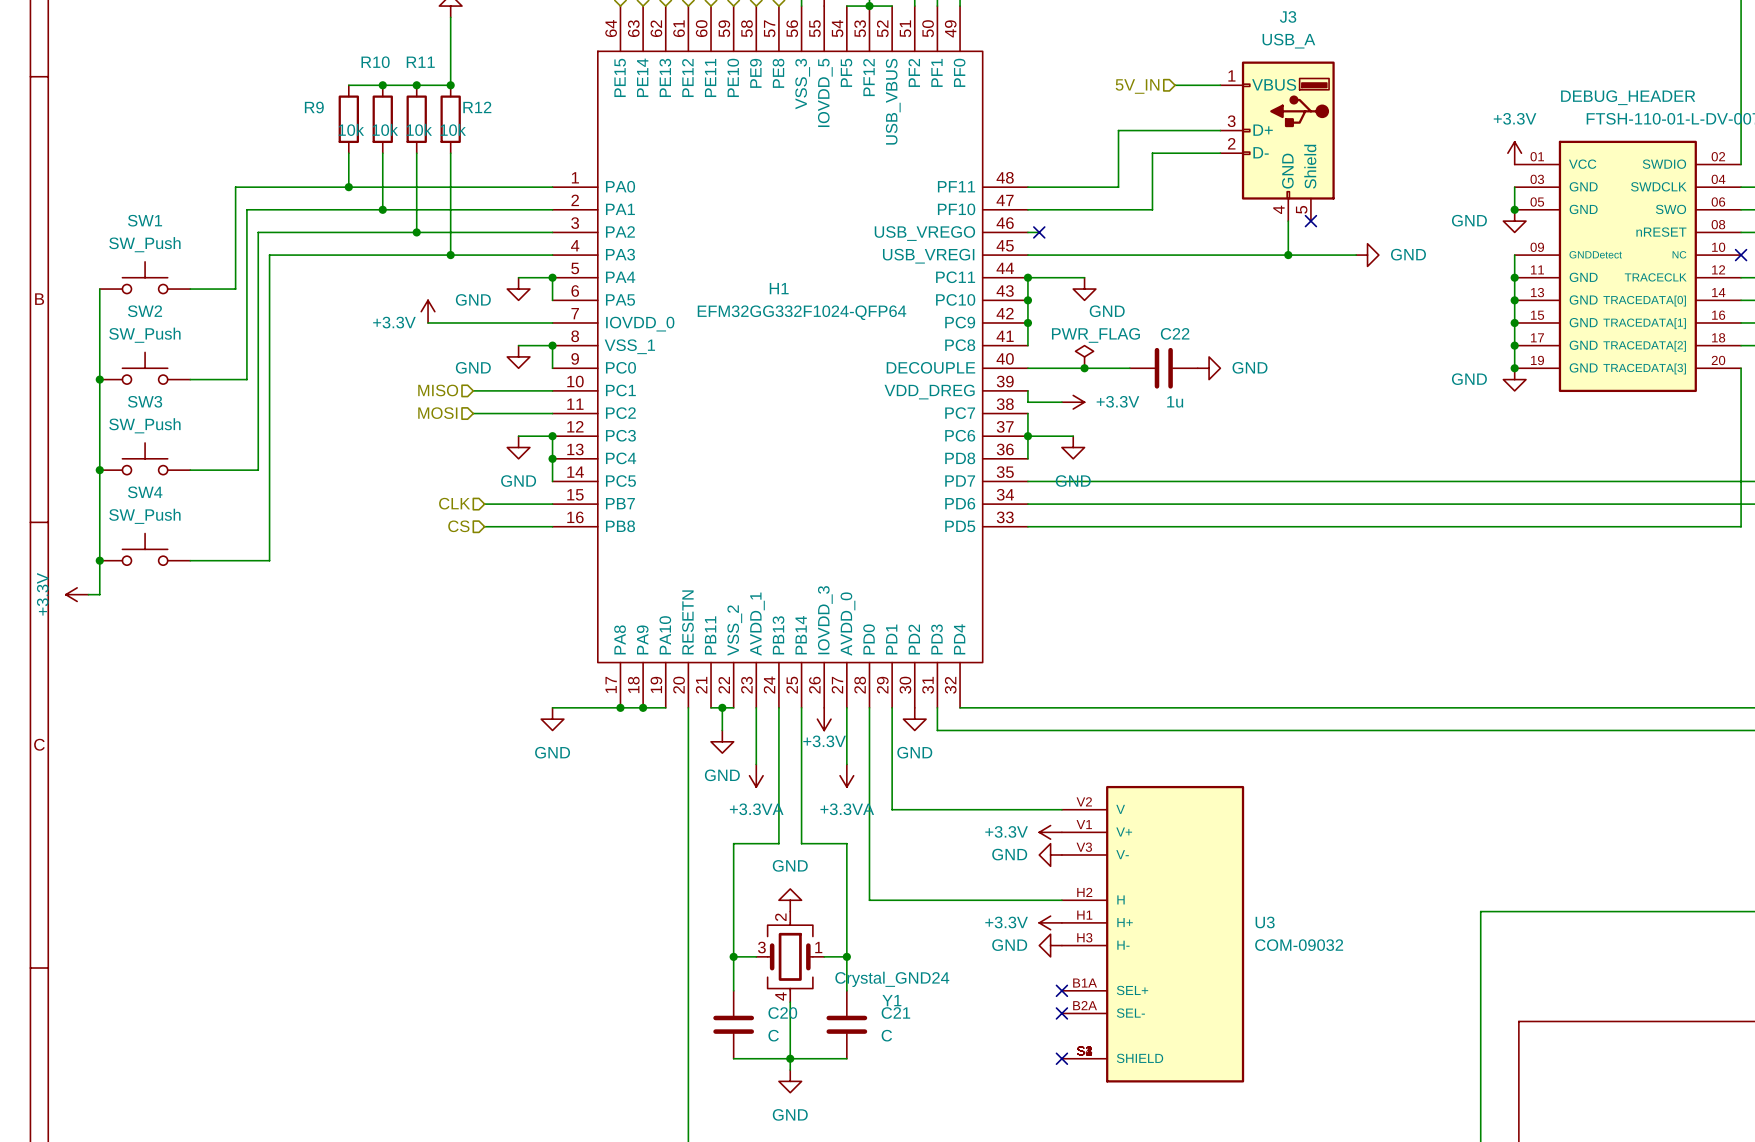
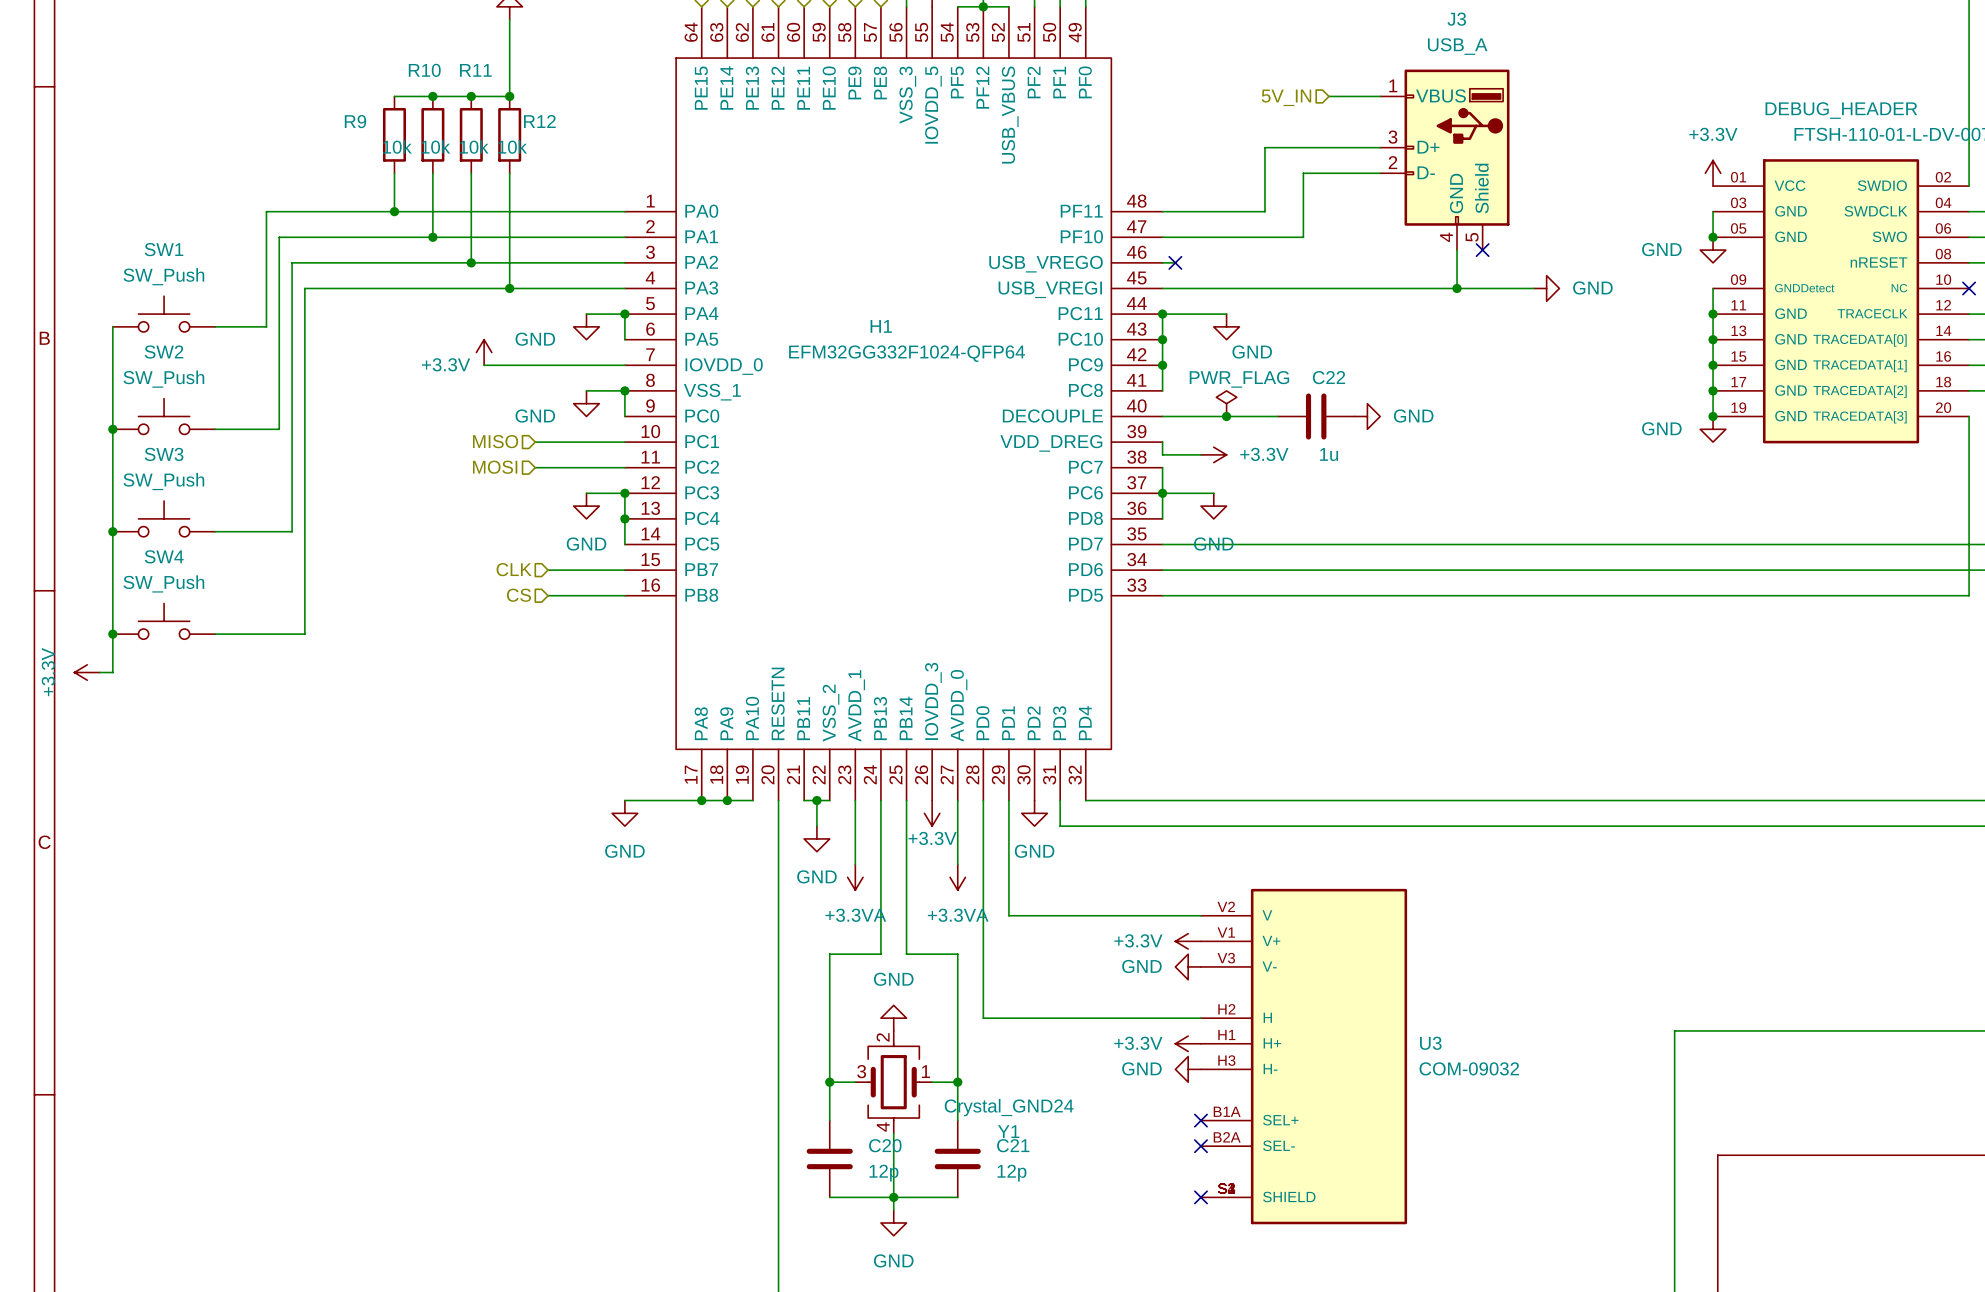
C20 value: C (773, 1035) -> 12p (883, 1173)
C21 value: C (886, 1035) -> 12p (1011, 1173)

